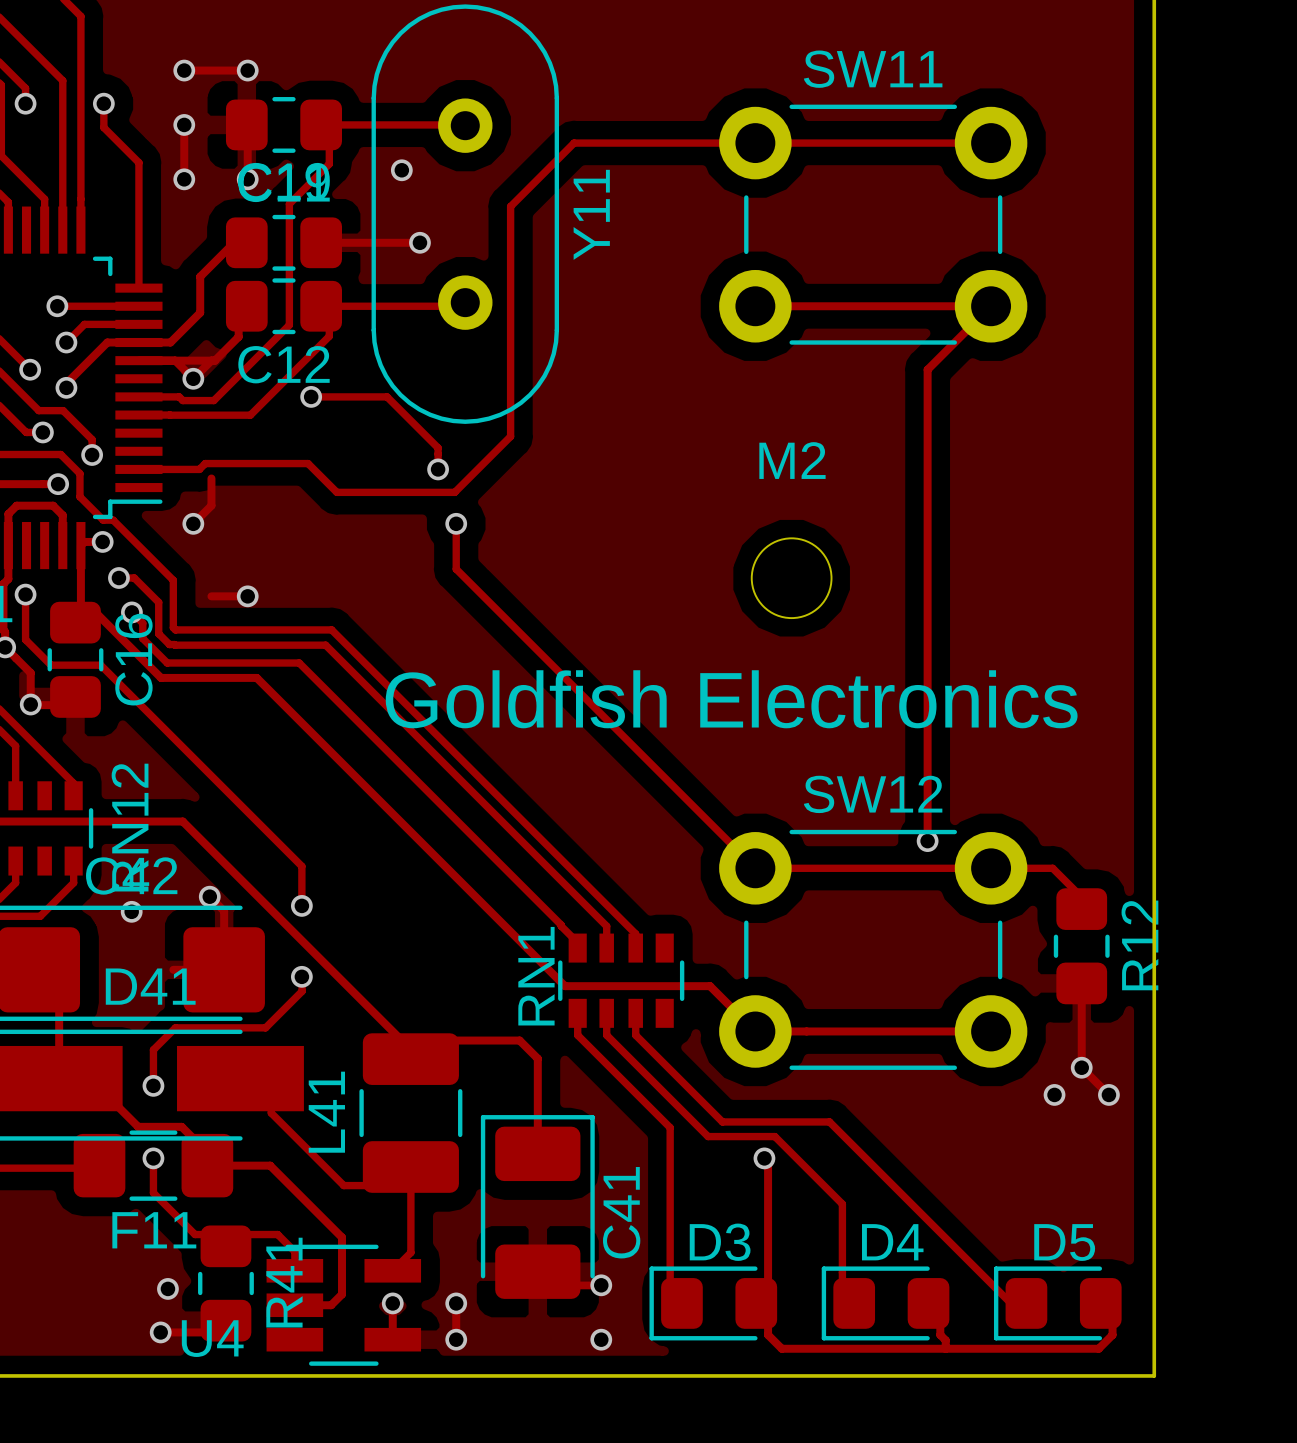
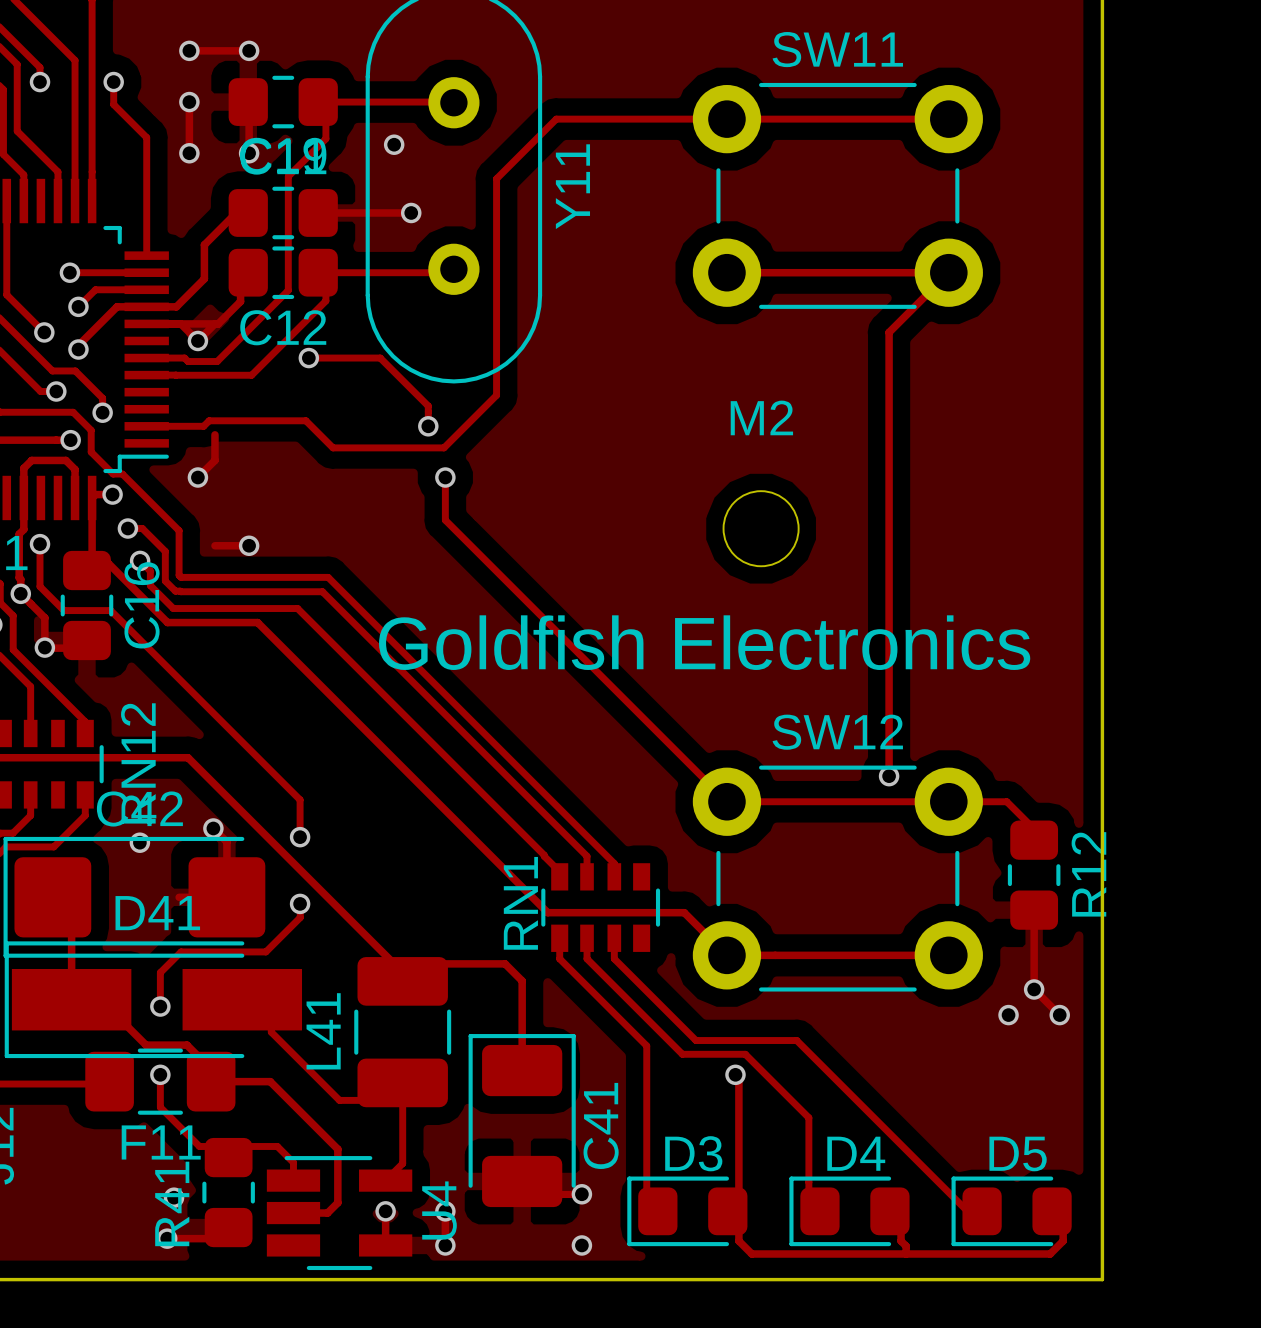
R41 name position: R41 (284, 1282) -> R41 (172, 1203)
U4 name rotation: 0° (212, 1338) -> 90° counterclockwise (439, 1210)
U4 name position: U4 (212, 1338) -> U4 (439, 1210)

